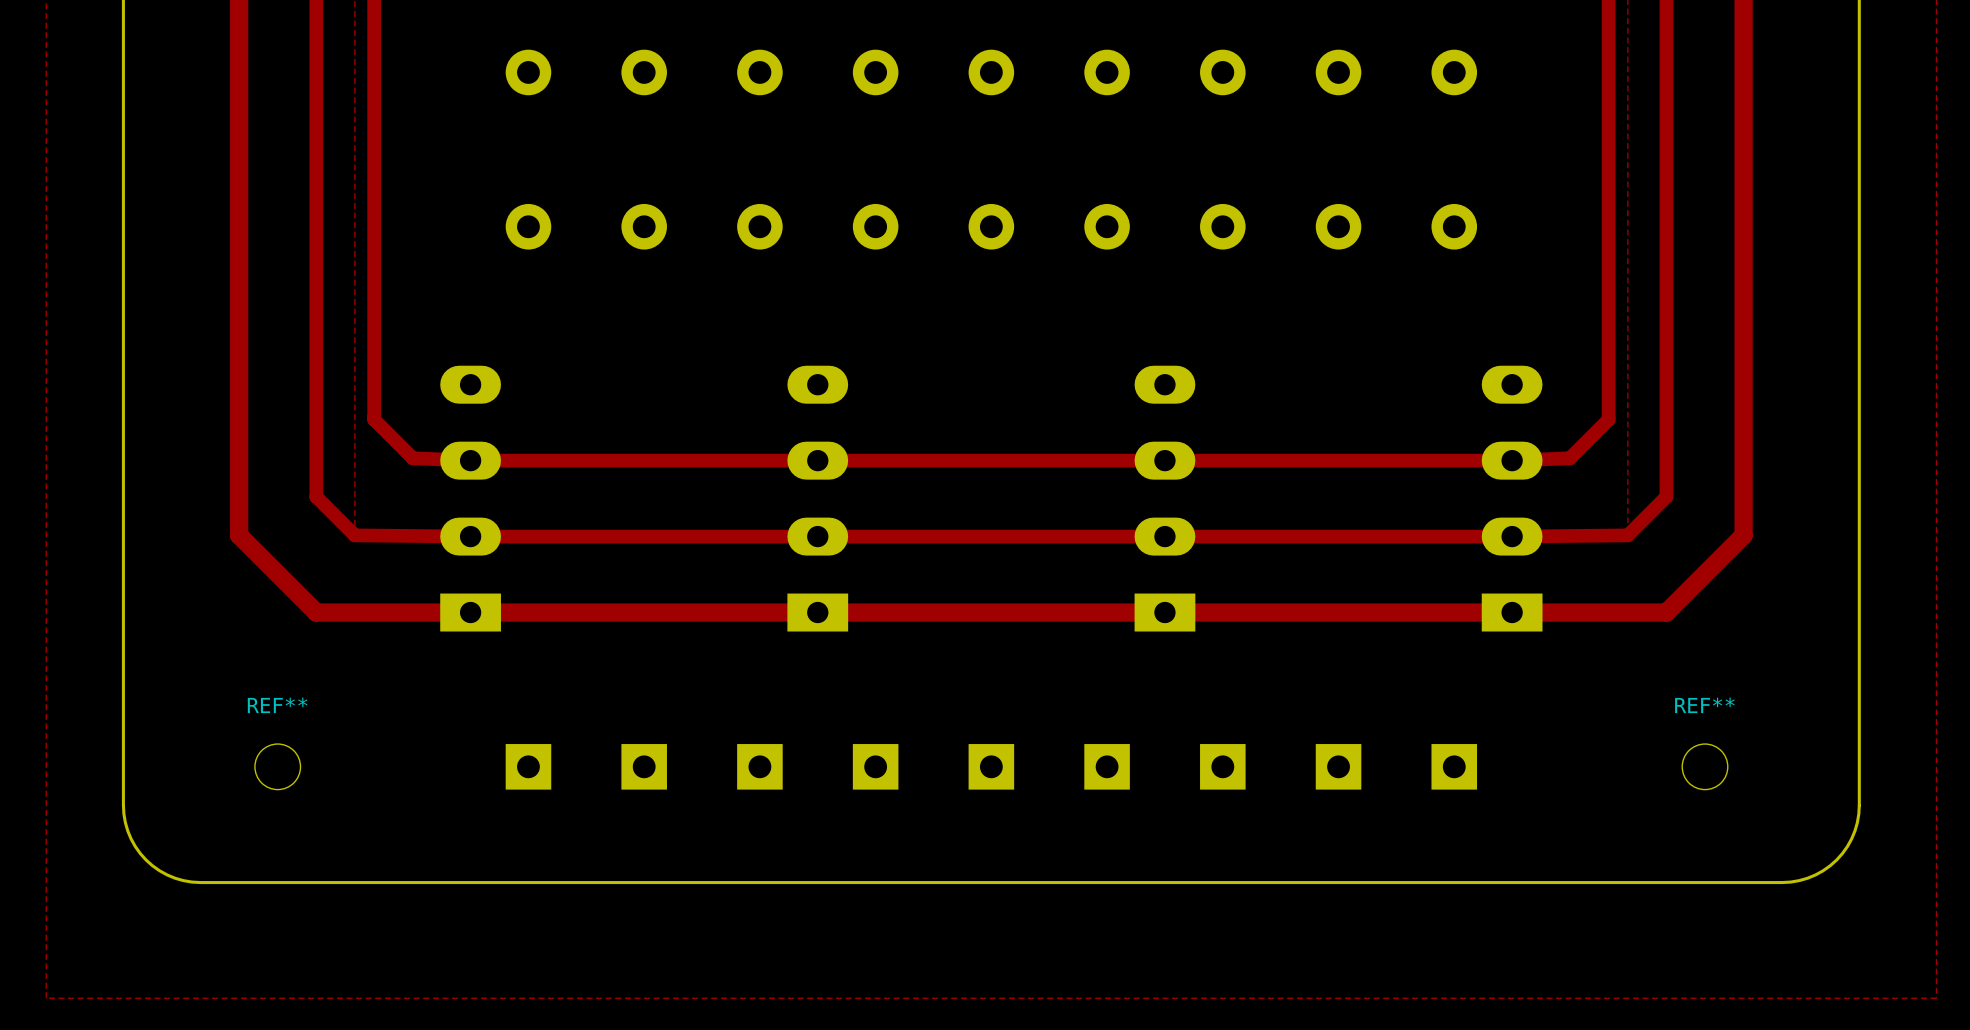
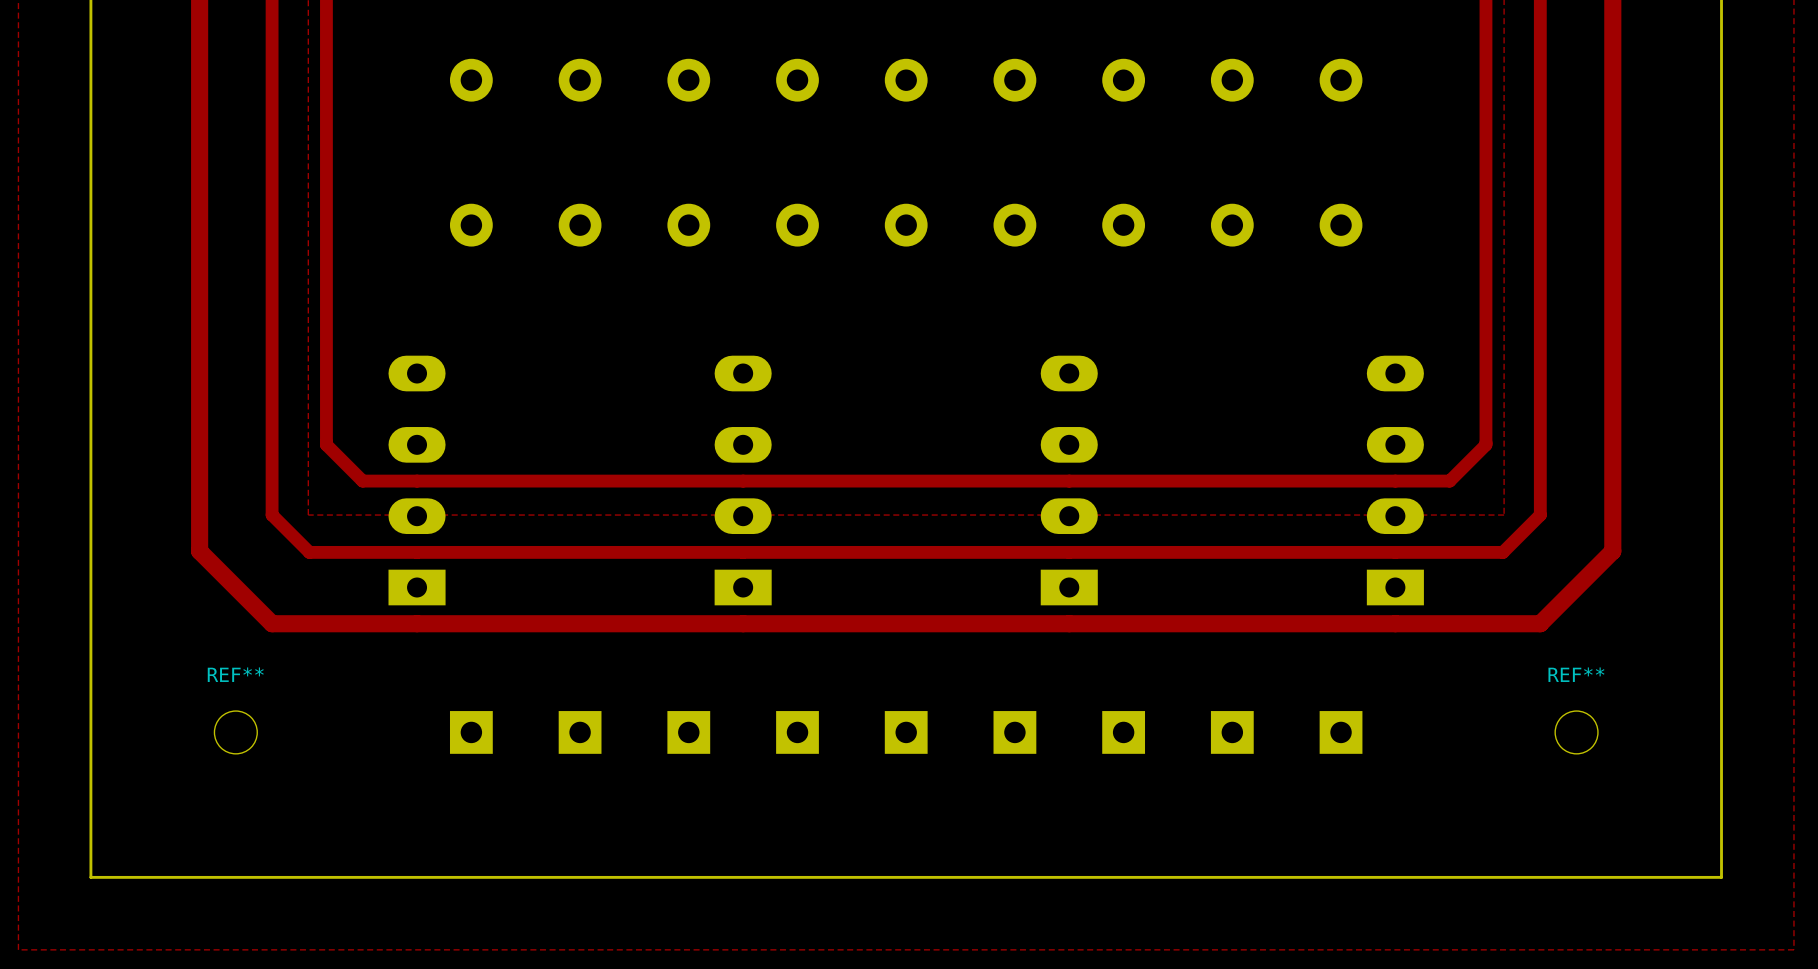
track: (374, 419) (412, 458) (470, 460) (1512, 460) (1569, 458) (1608, 419) -> (326, 406) (326, 444) (362, 481) (1449, 481) (1485, 444) (1485, 406)
track: (316, 496) (354, 535) (470, 536) (1627, 535) (1666, 496) -> (272, 478) (272, 515) (309, 552) (1502, 552) (1540, 515) (1540, 478)
track: (239, 535) (316, 612) (1666, 612) (1743, 535) -> (199, 515) (199, 551) (272, 623) (1540, 623) (1612, 551) (1612, 515)
board edge: (123, 805) (125, 822) (131, 838) (146, 859) (159, 870) (175, 878) (200, 882) (1782, 882) (1799, 880) (1815, 874) (1836, 859) (1851, 838) (1857, 822) (1859, 805) -> (90, 768) (90, 877) (1721, 877) (1721, 768)

